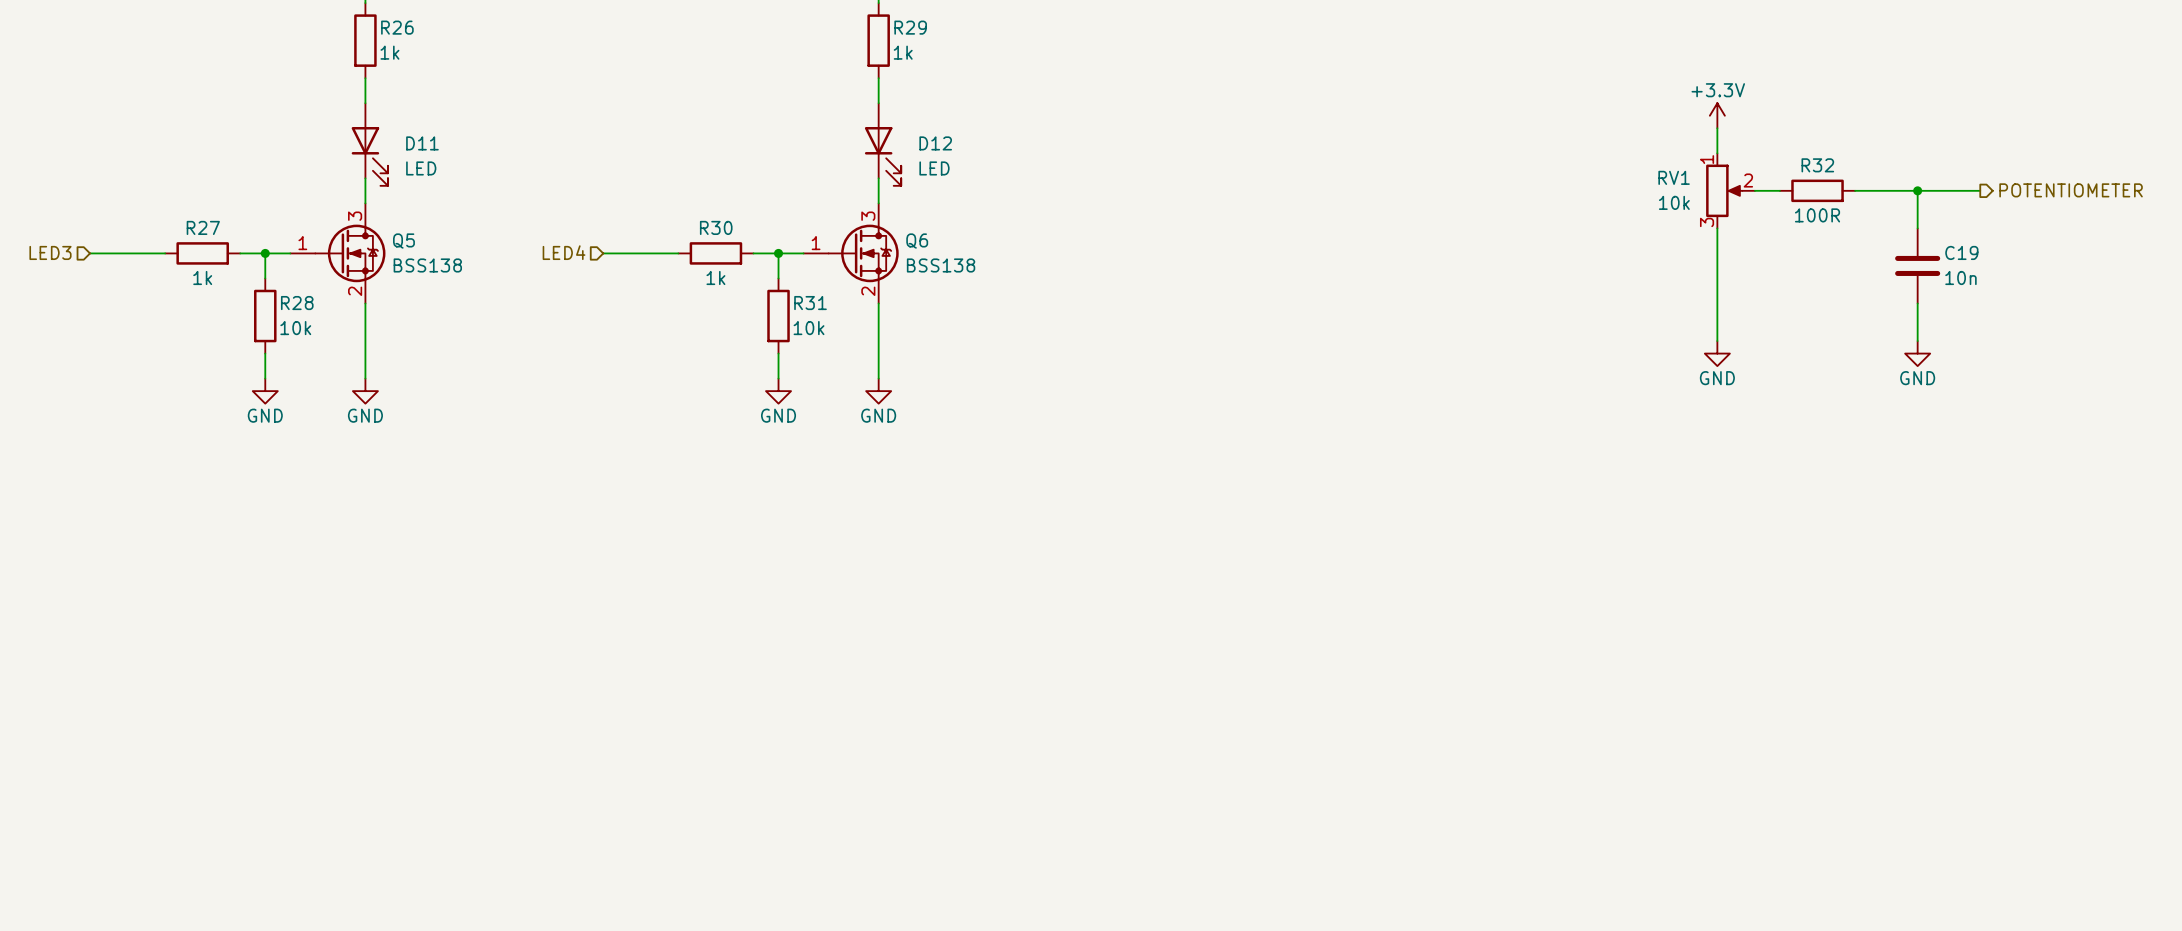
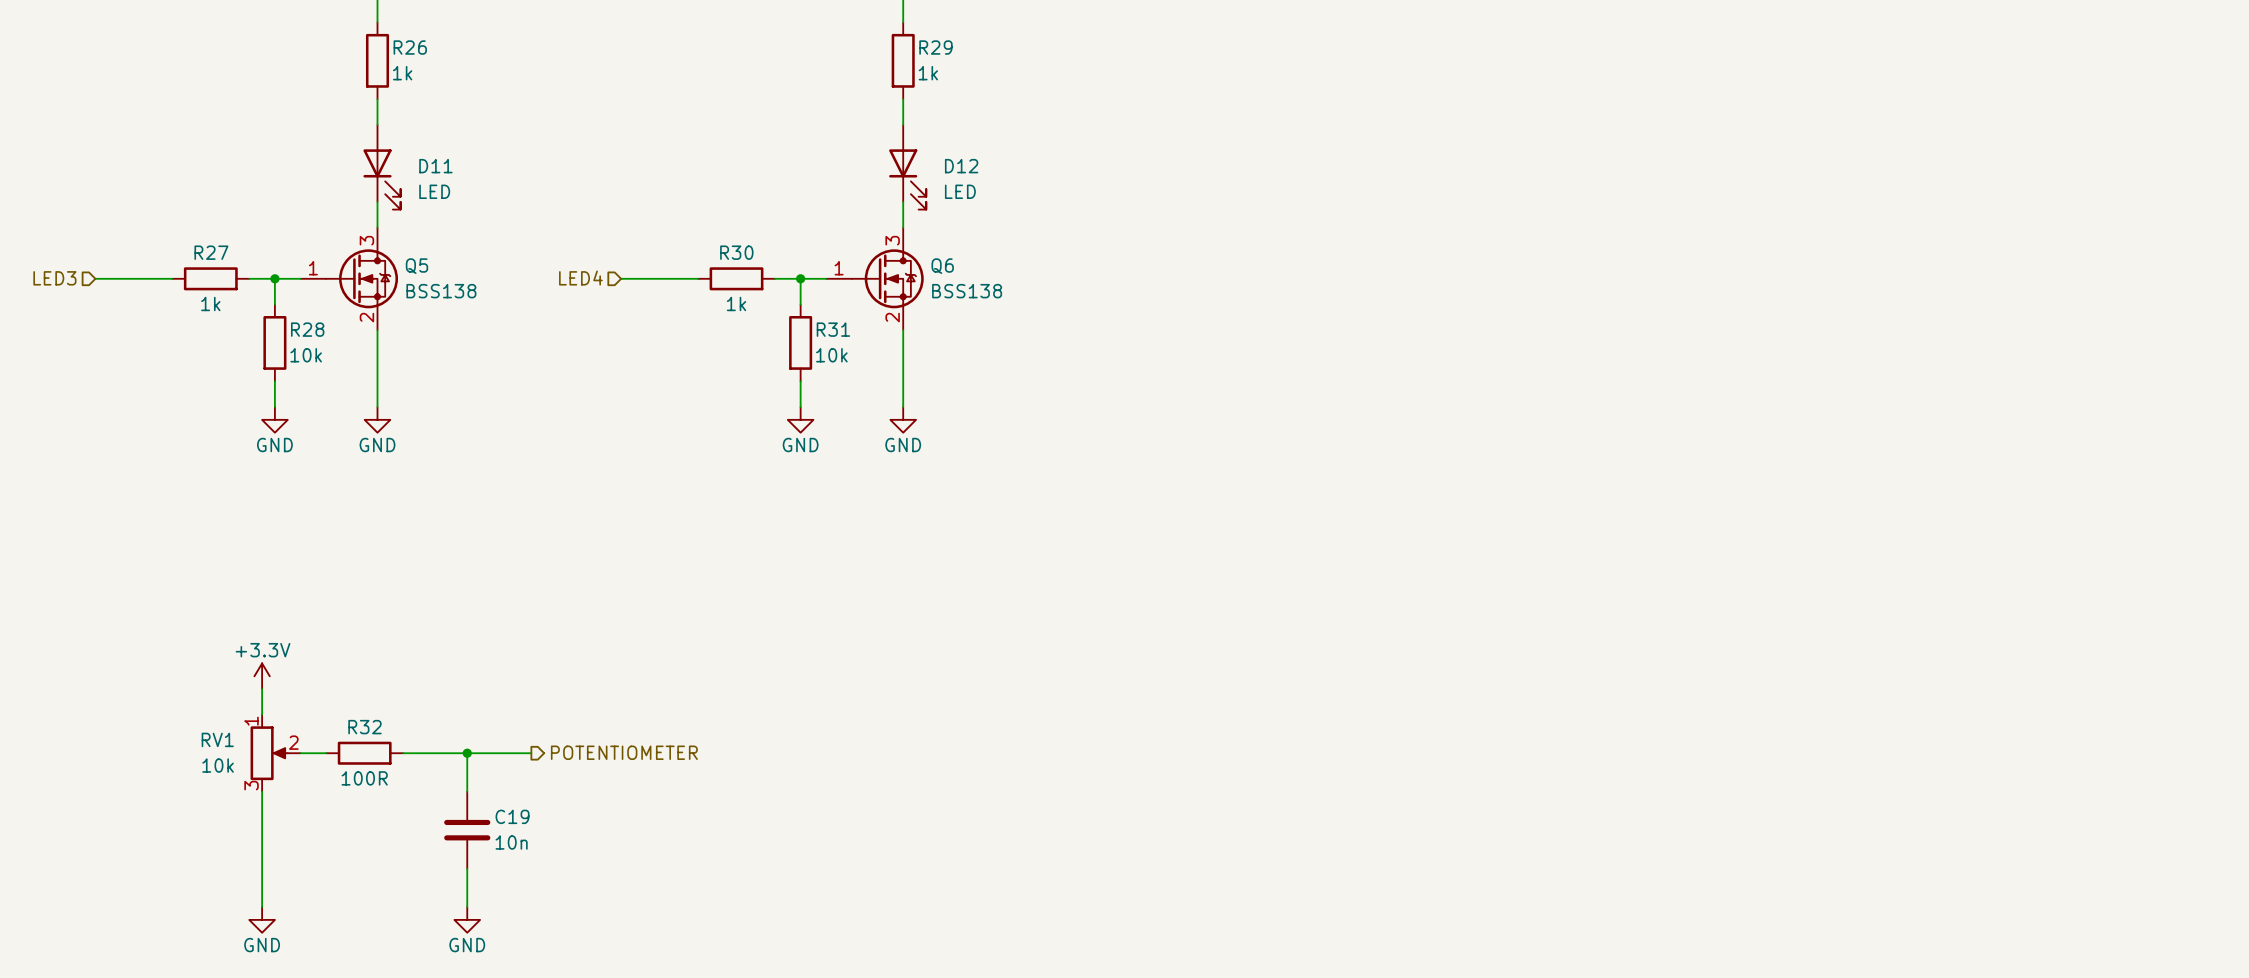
power symbol: +3.3V (1717, 115) -> none
wire: (1717, 128) (1717, 153) -> none
RV1 position: (1730, 190) -> (275, 753)
wire: (1754, 190) (1779, 190) -> none
R32 position: (1817, 190) -> (364, 753)
wire: (1855, 190) (1980, 190) -> none
wire: (1917, 190) (1917, 228) -> none
junction: (1917, 190) -> none
hierarchical label: POTENTIOMETER (2071, 190) -> none
wire: (1717, 228) (1717, 341) -> none
C19 position: (1917, 265) -> (467, 830)
wire: (1917, 303) (1917, 341) -> none
power symbol: GND (1717, 353) -> none
power symbol: GND (1917, 353) -> none
power symbol: none -> +3.3V (262, 676)
wire: none -> (262, 689) (262, 714)
wire: none -> (300, 753) (326, 753)
wire: none -> (403, 753) (531, 753)
wire: none -> (467, 753) (467, 791)
junction: none -> (467, 753)
hierarchical label: none -> POTENTIOMETER (624, 752)
wire: none -> (262, 791) (262, 907)
wire: none -> (467, 868) (467, 907)
power symbol: none -> GND (262, 919)
power symbol: none -> GND (467, 919)

